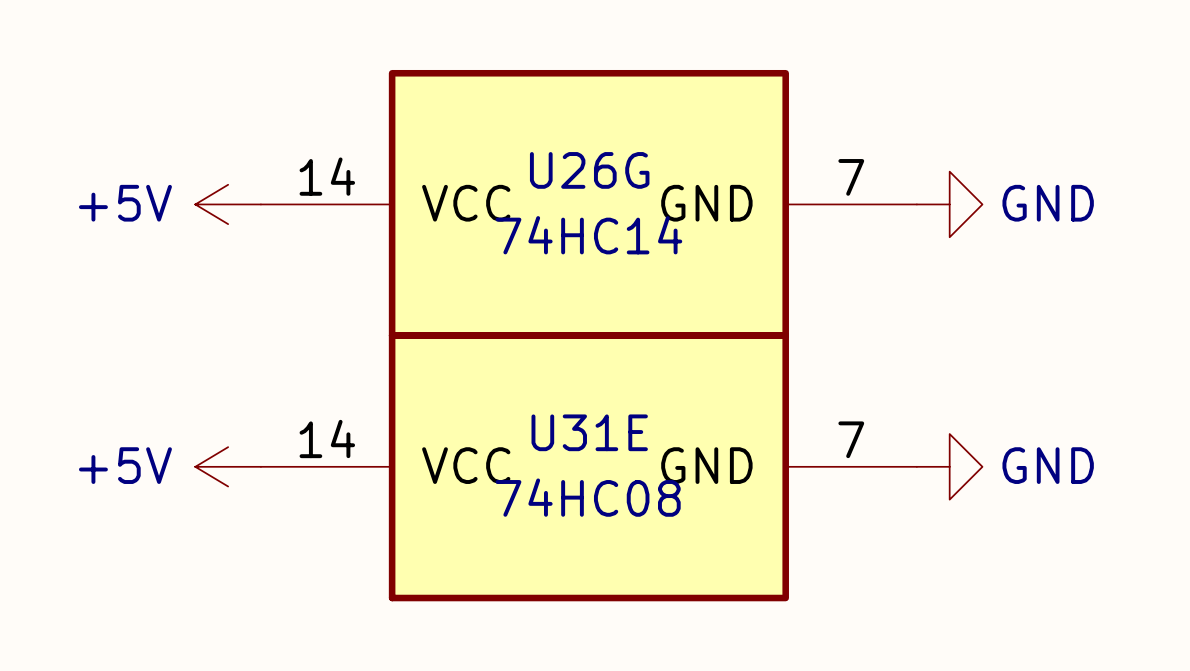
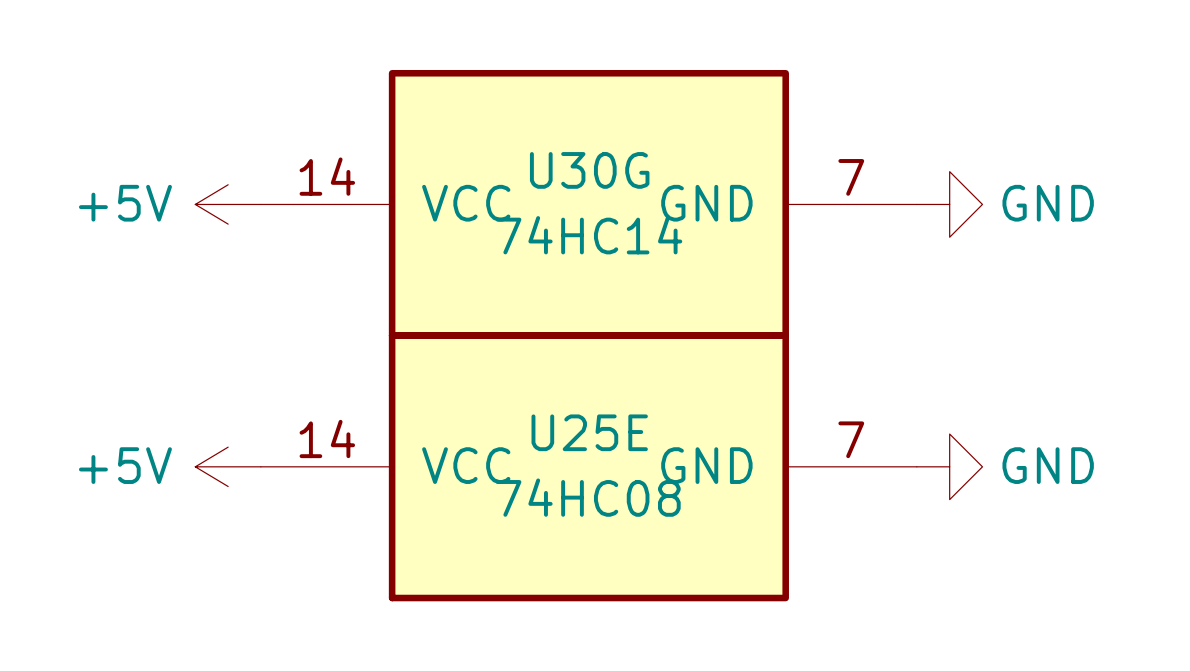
U26G name: U26G (589, 170) -> U30G (589, 170)
U31E name: U31E (589, 432) -> U25E (589, 432)

